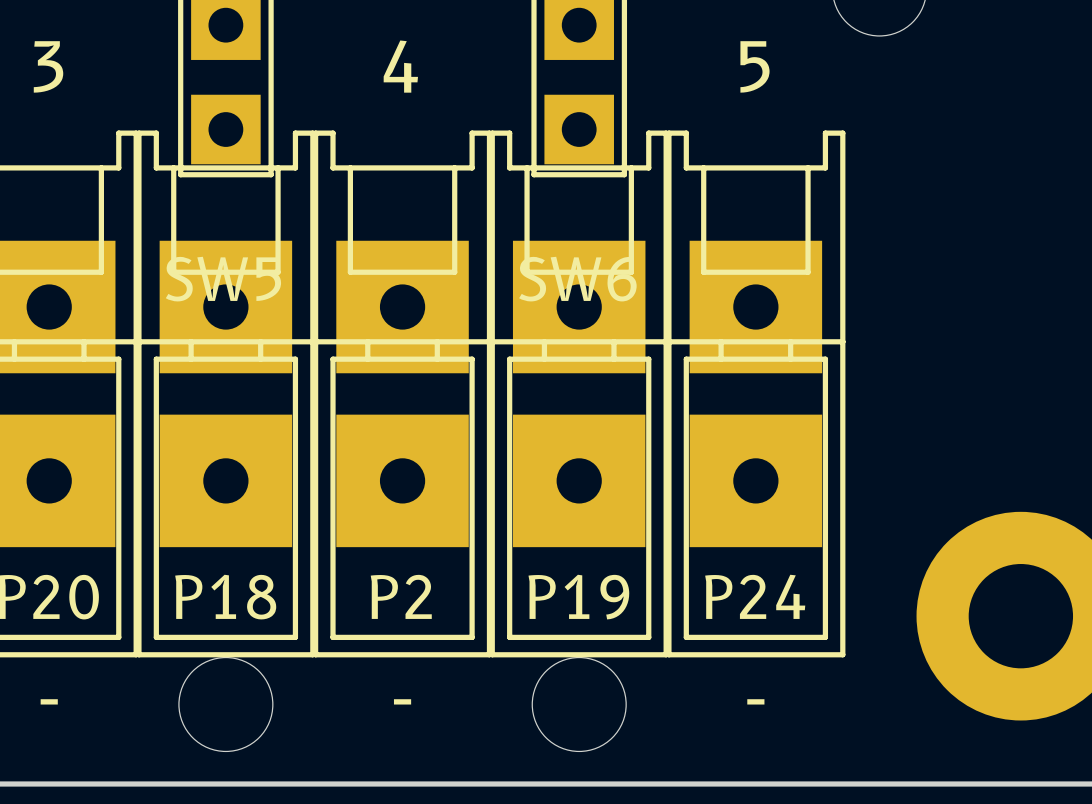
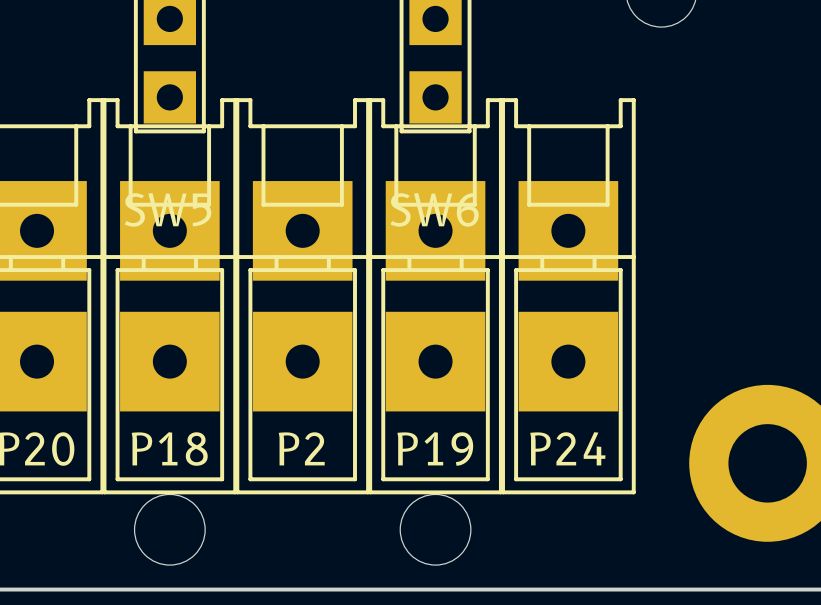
text: 3 (48, 66) -> none
text: 4 (400, 66) -> none
text: 5 (754, 66) -> none
text: - (49, 701) -> none
text: - (402, 701) -> none
text: - (755, 701) -> none

